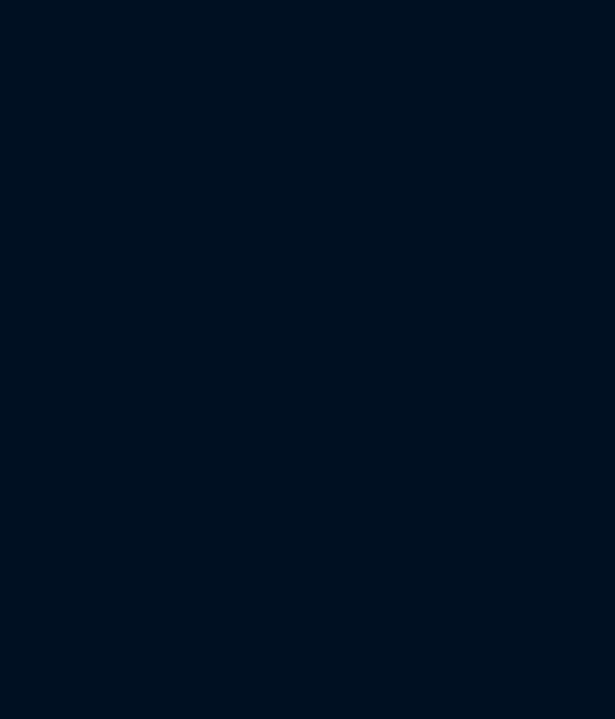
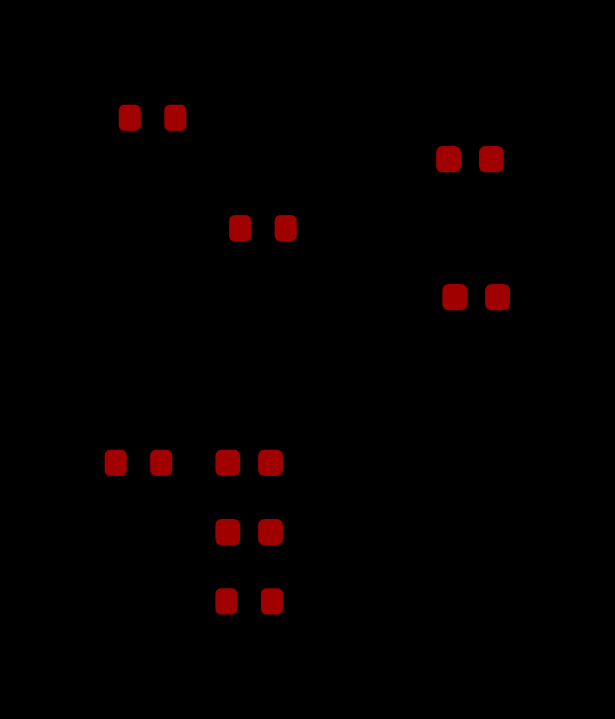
part: none -> (152, 117)
part: none -> (469, 159)
part: none -> (262, 228)
part: none -> (476, 297)
part: none -> (138, 462)
part: none -> (249, 462)
part: none -> (249, 532)
part: none -> (249, 601)

